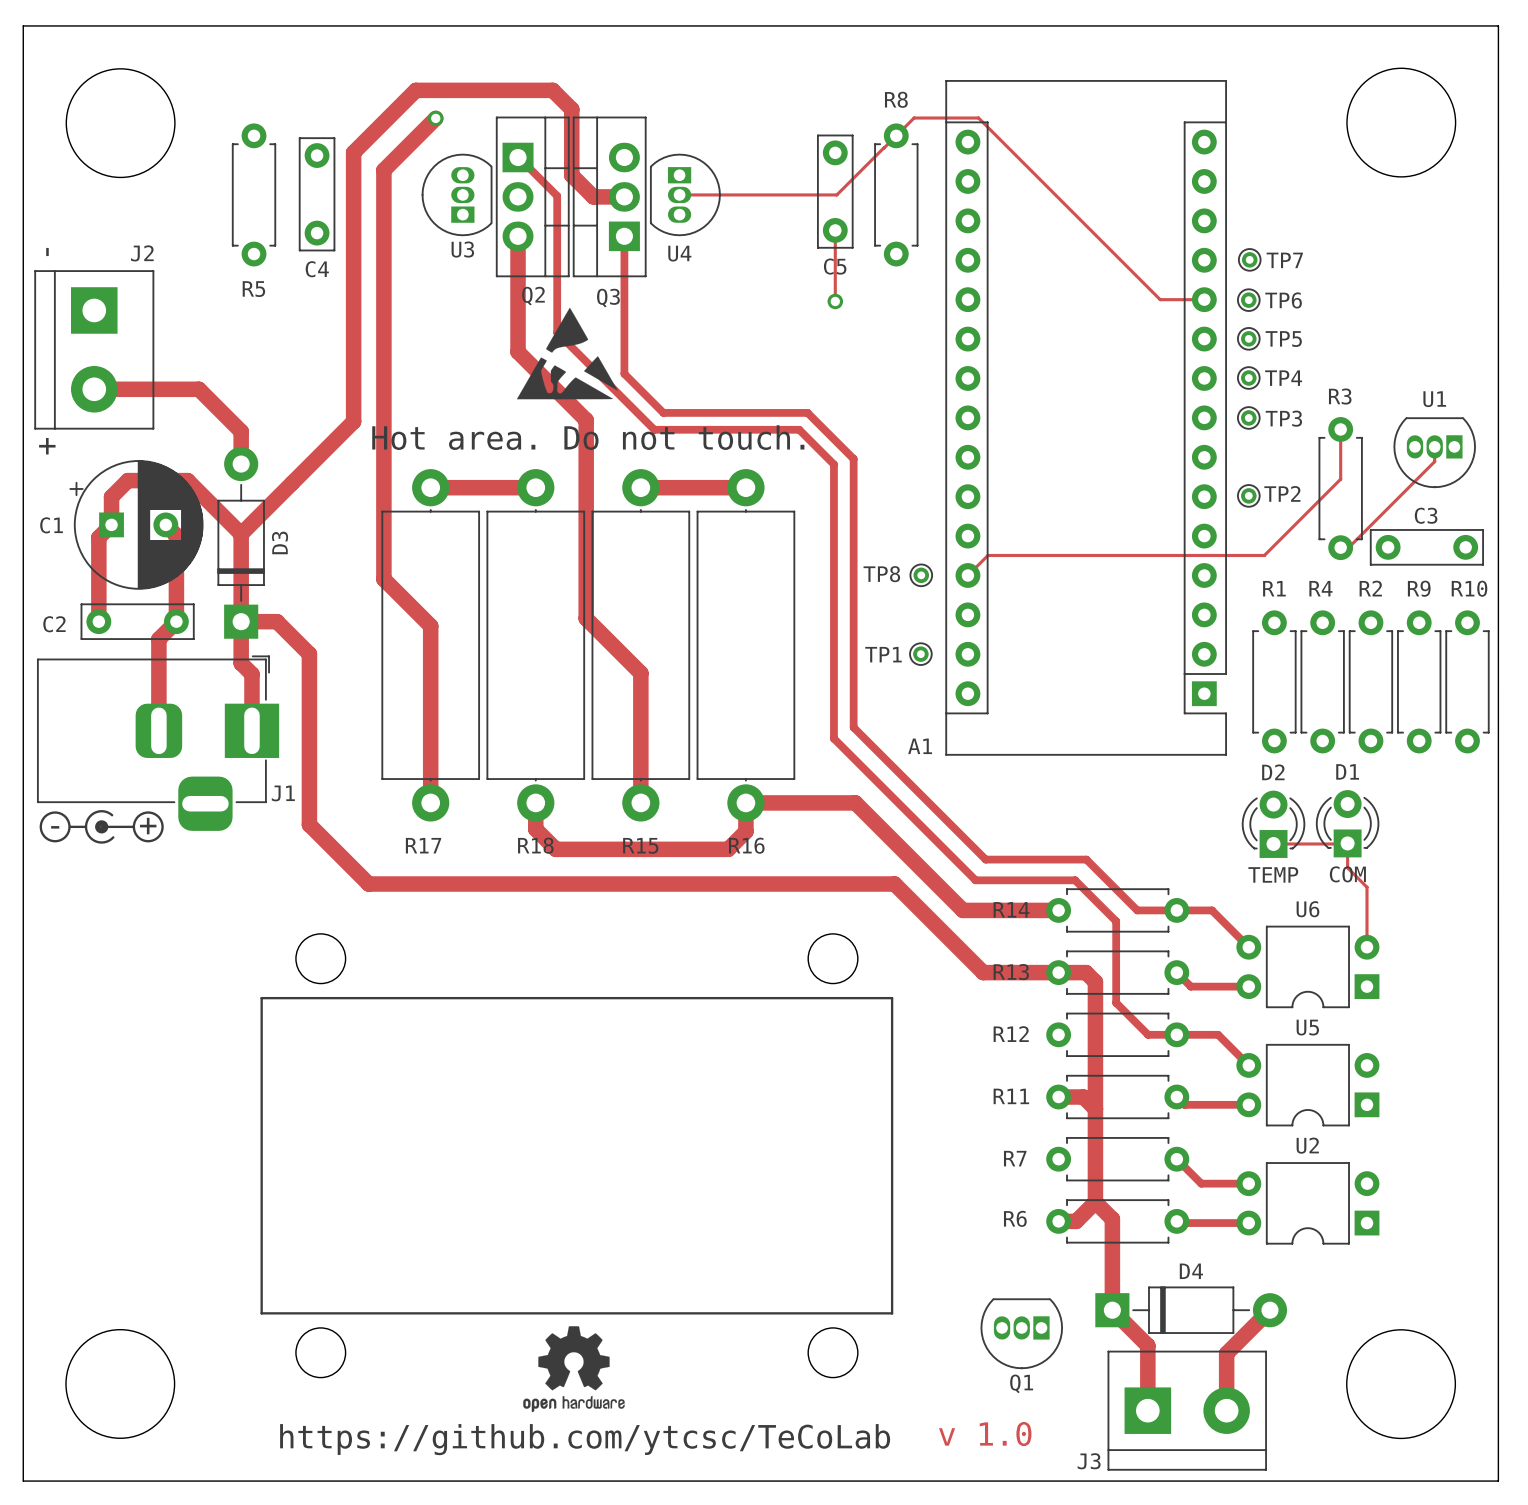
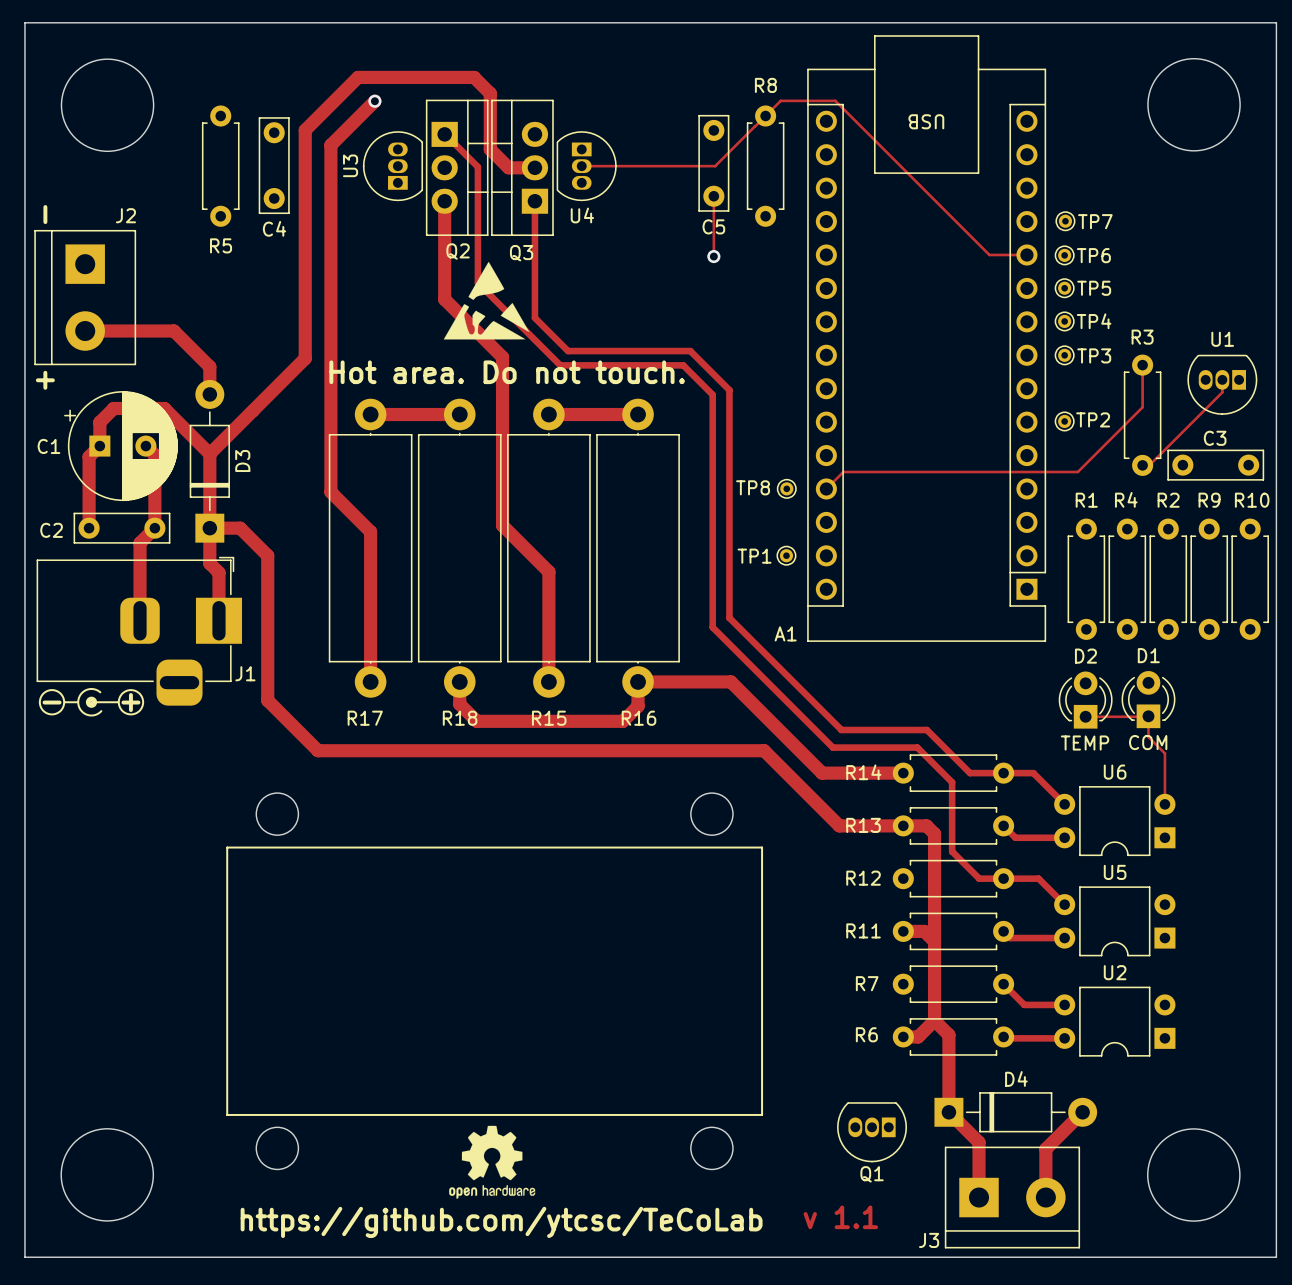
A1 footprint: [945, 80, 1227, 756] -> [807, 35, 1047, 642]
U3 name rotation: 0° (462, 249) -> 90° counterclockwise (350, 165)
U3 name position: U3 (462, 249) -> U3 (350, 165)
text: v 1.0 (985, 1434) -> v 1.1 (840, 1217)

